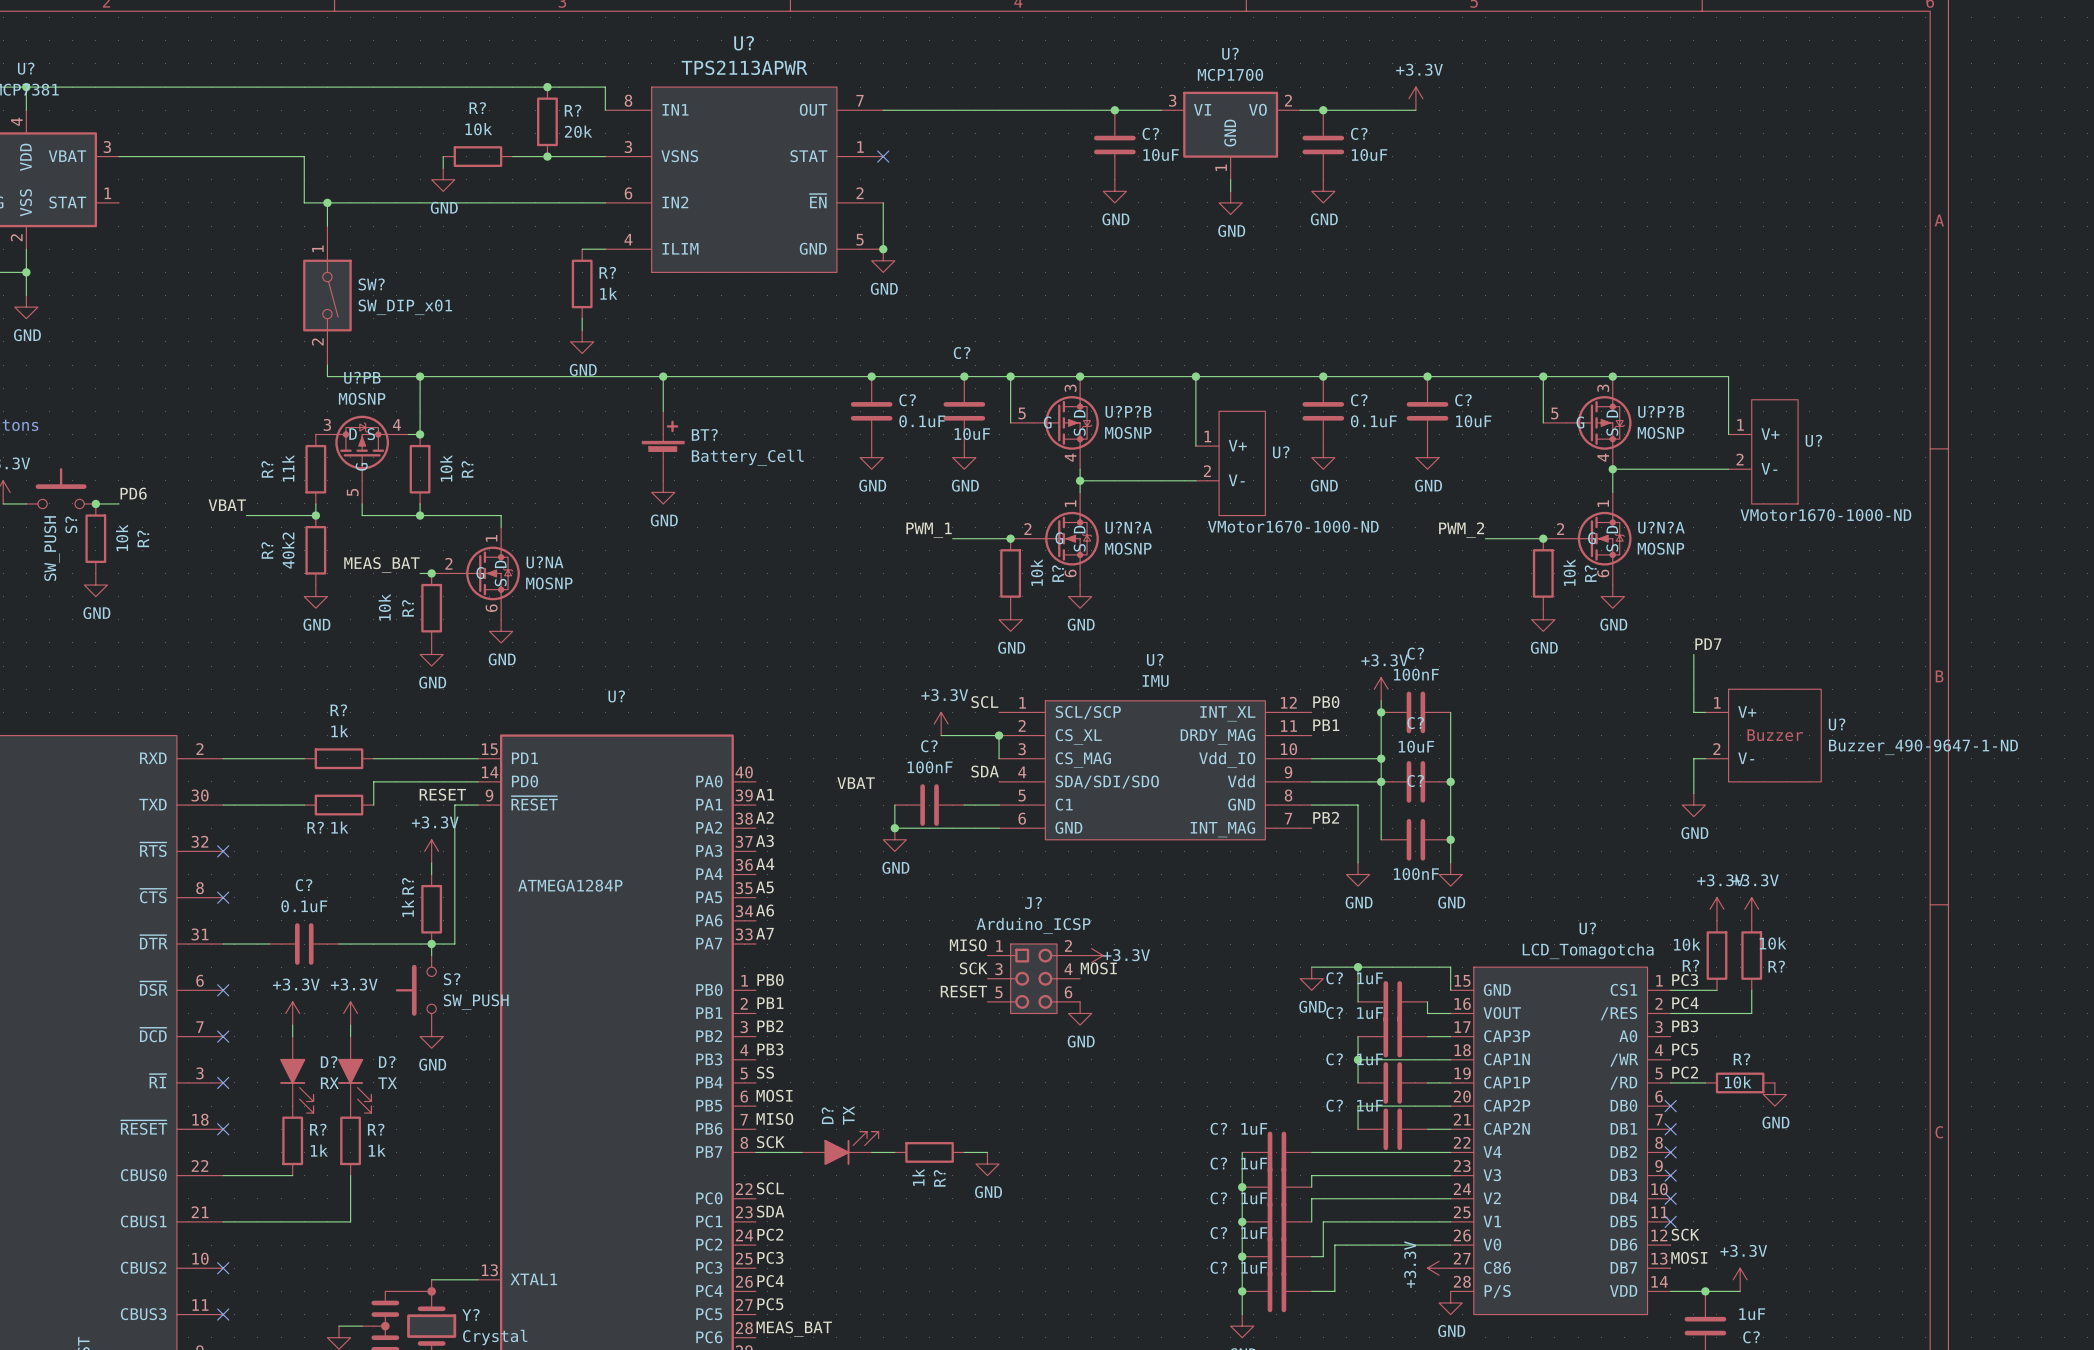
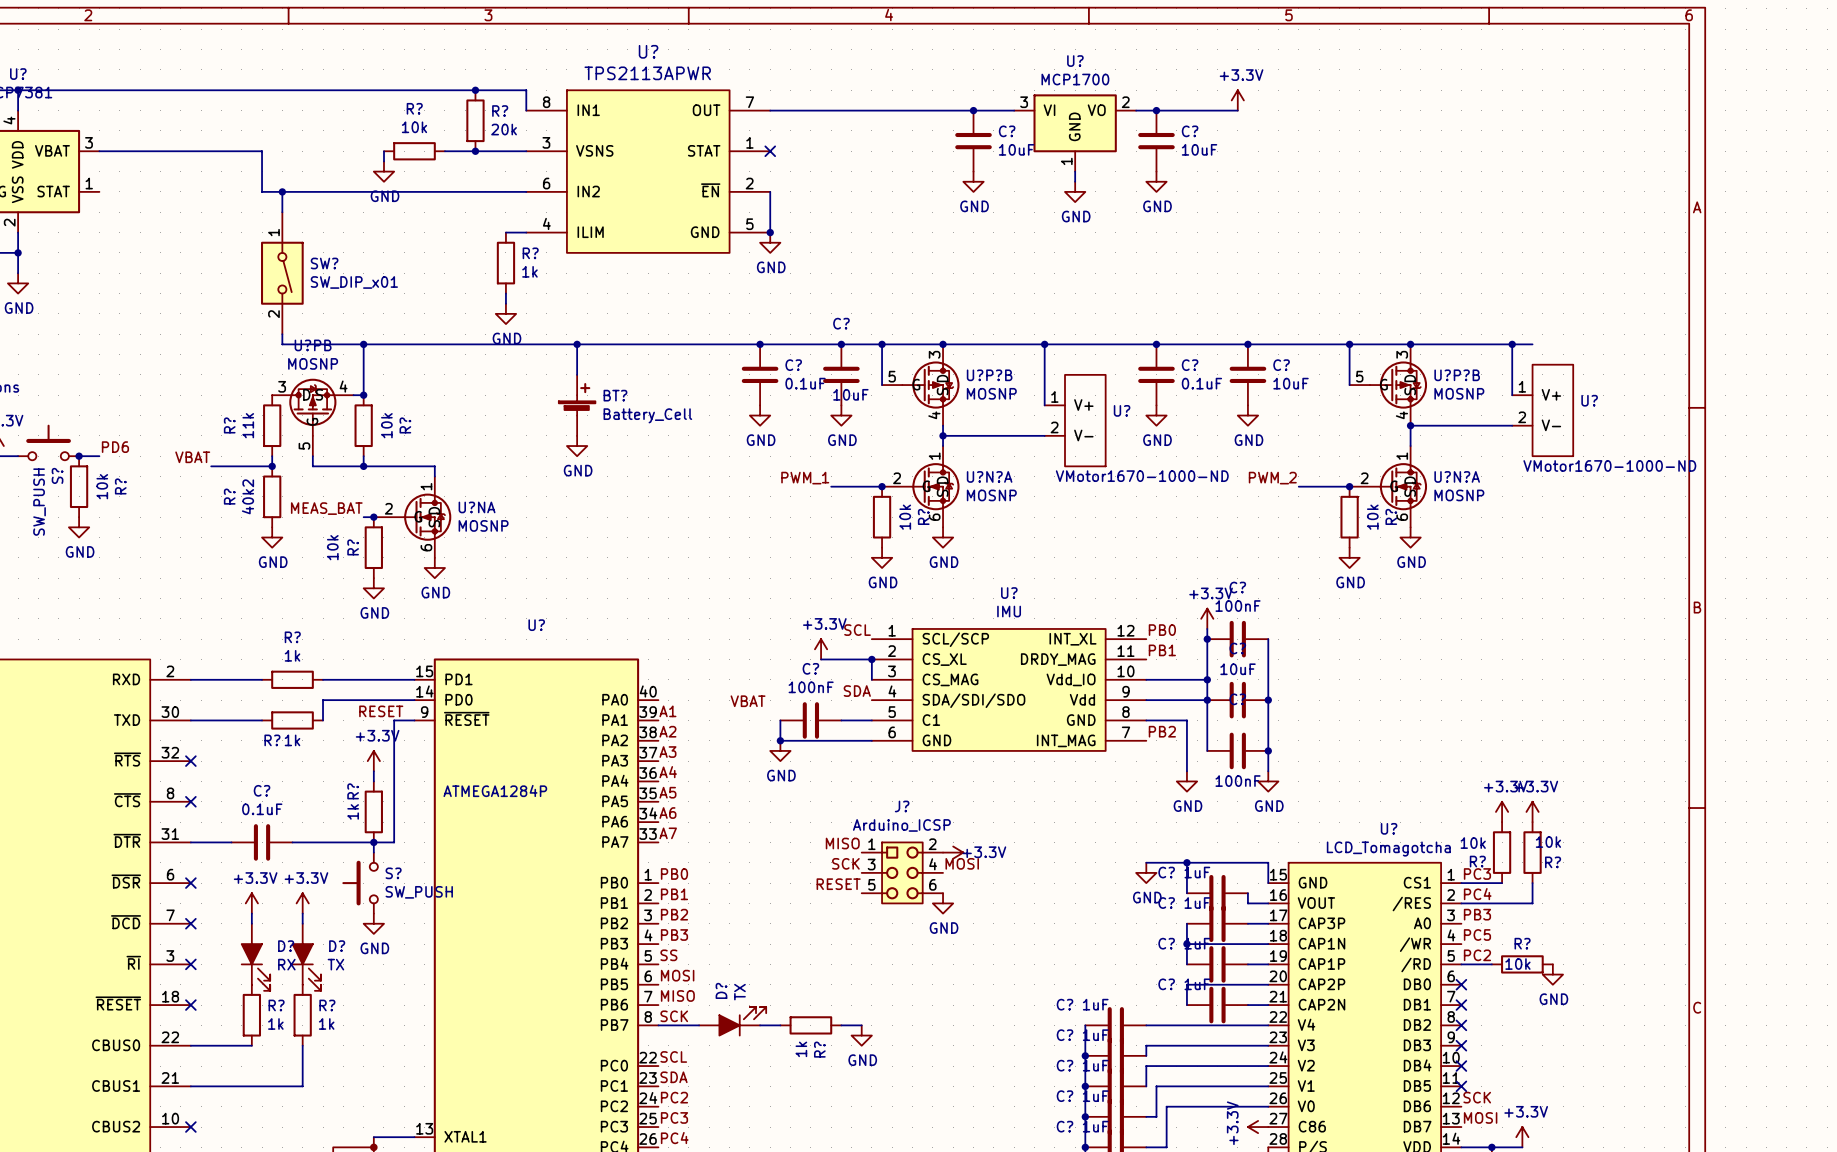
wire: none -> (1512, 344) (1532, 344)
junction: none -> (1512, 344)
label: PD7 (1708, 644) -> none
wire: (1693, 654) (1693, 712) (1705, 712) -> none
U?: Buzzer_490-9647-1-ND (1763, 735) -> none
wire: (1705, 758) (1693, 758) (1693, 793) -> none
power symbol: GND (1693, 805) -> none

